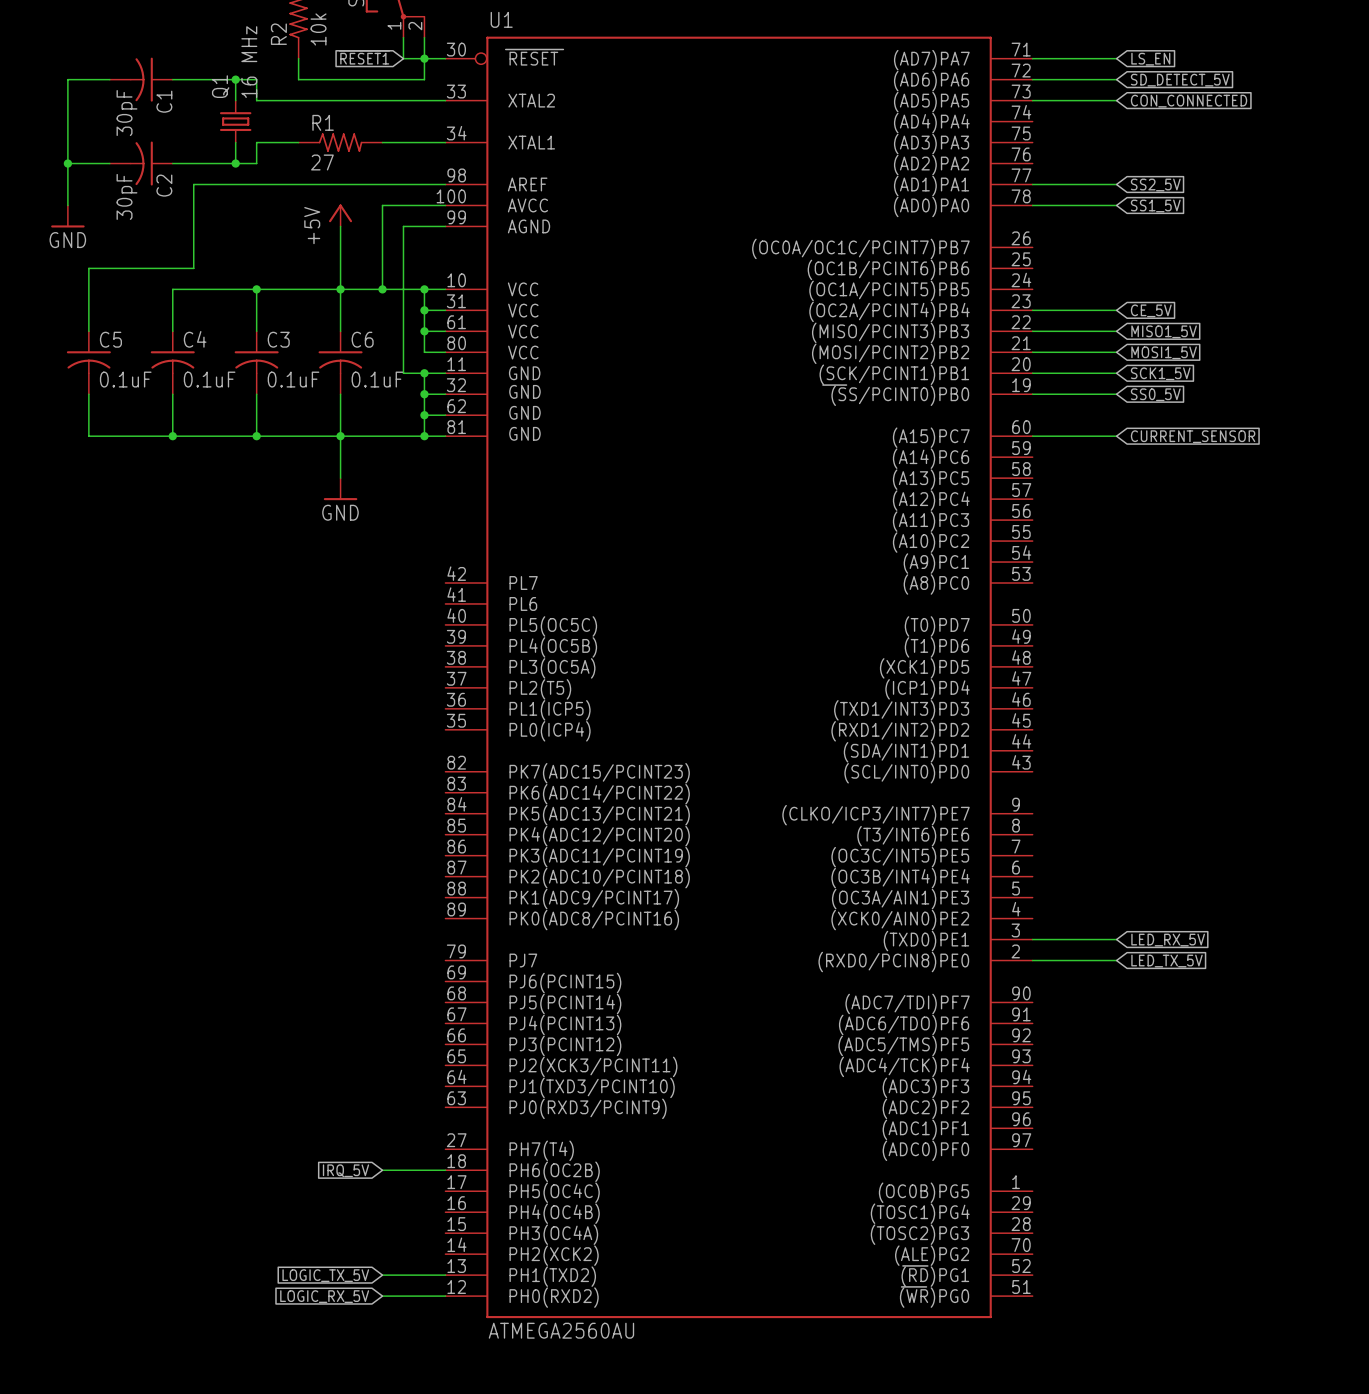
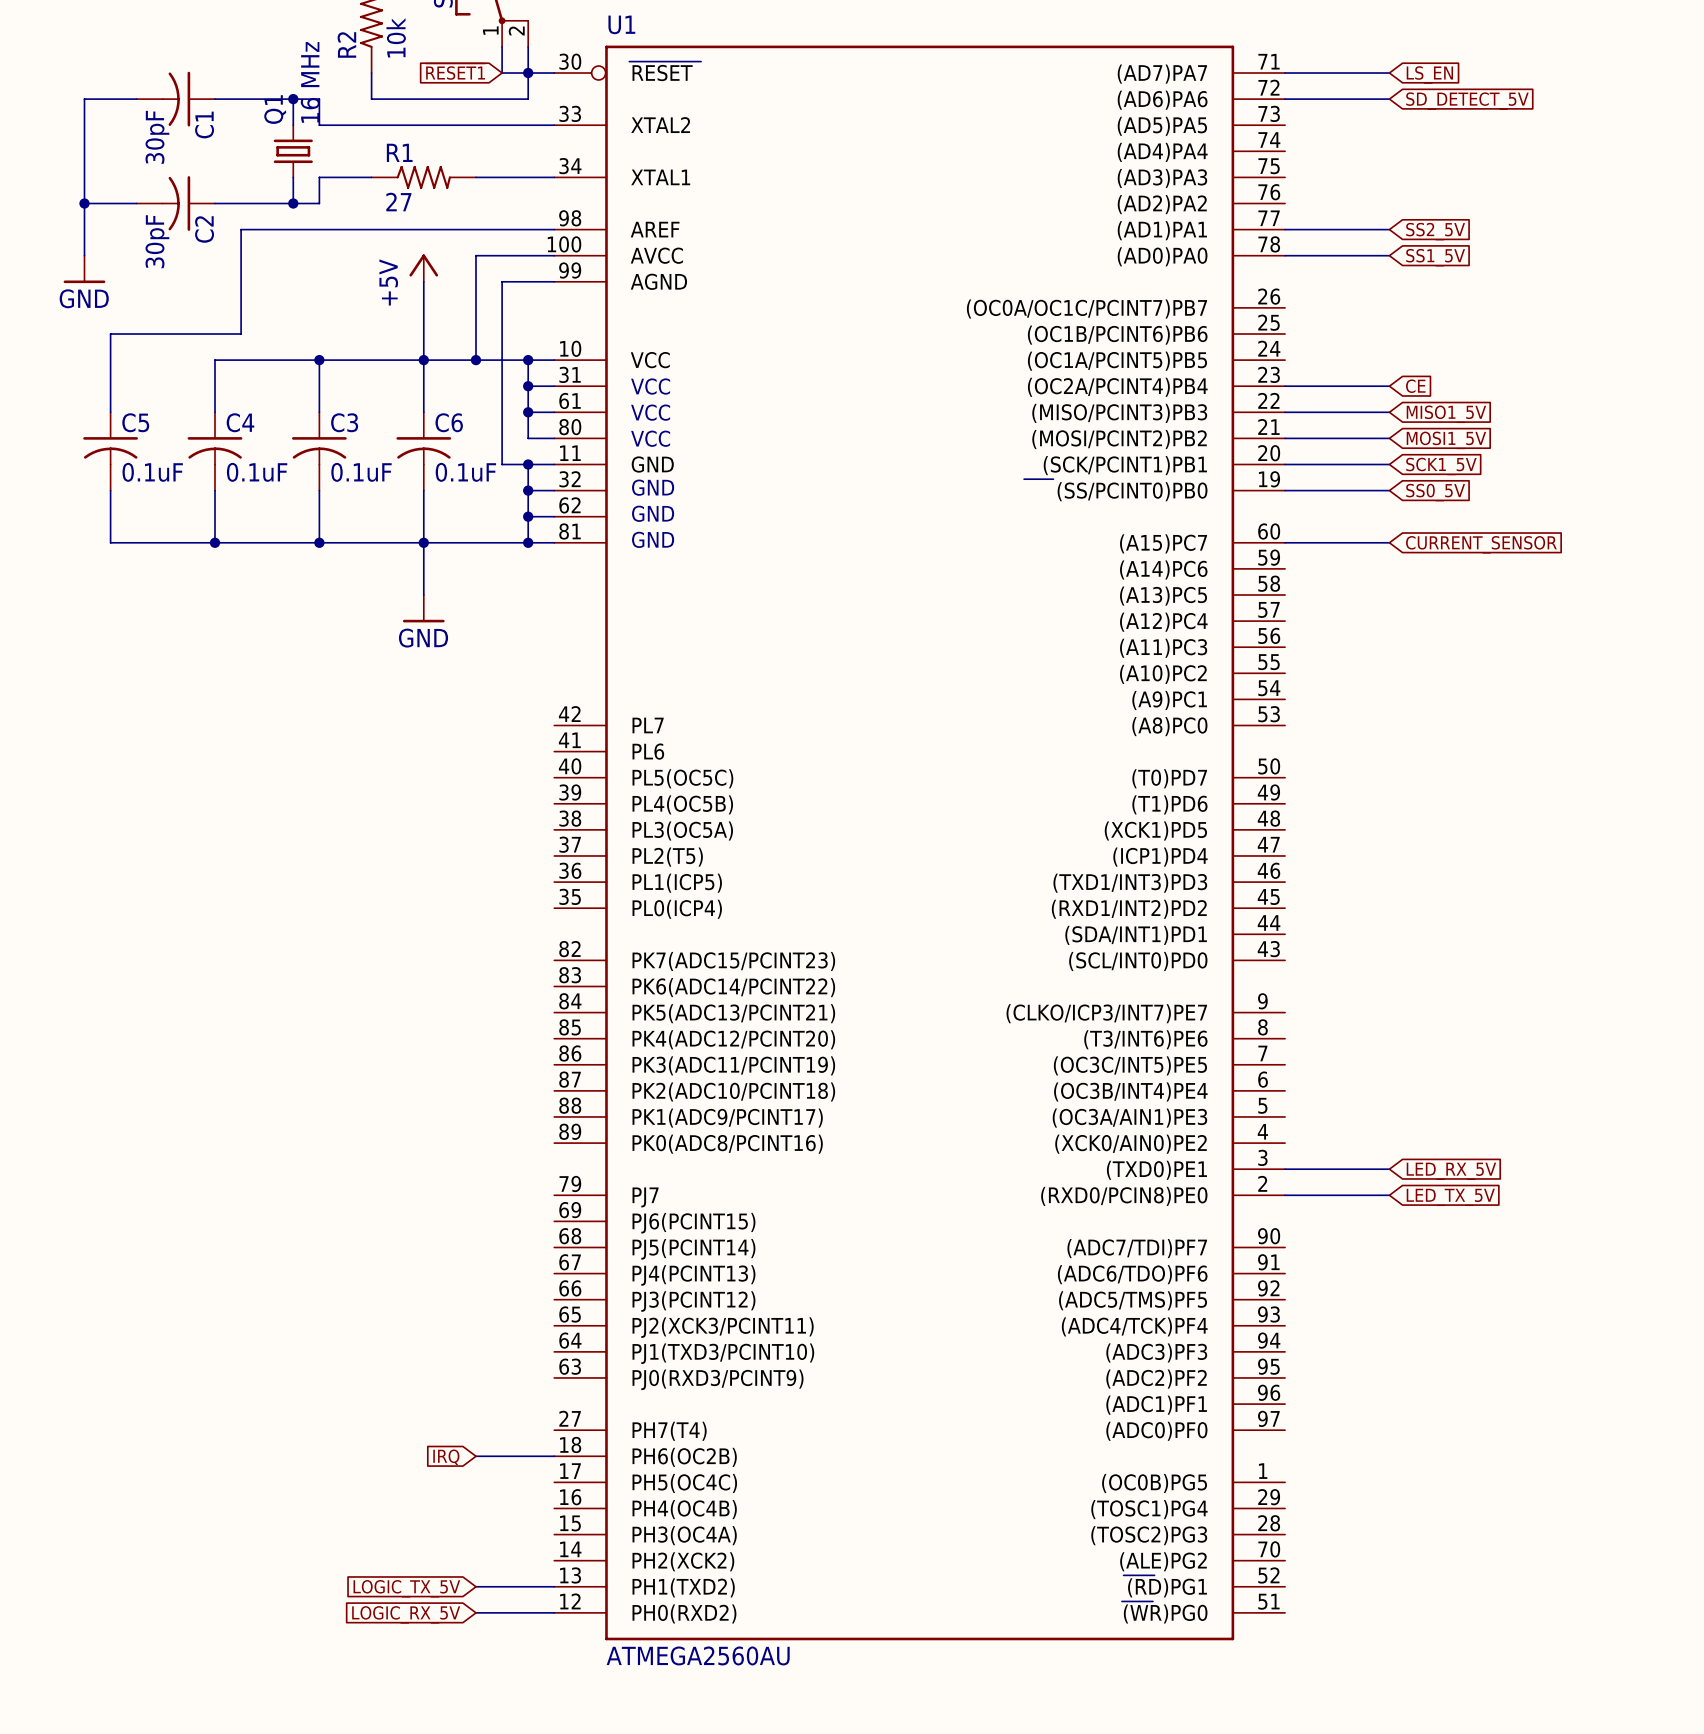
wire: (1032, 100) (1116, 100) -> none
global label: CON_CONNECTED (1189, 101) -> none
global label: CE_5V (1151, 310) -> CE (1415, 386)
global label: IRQ_5V (345, 1170) -> IRQ (446, 1457)

